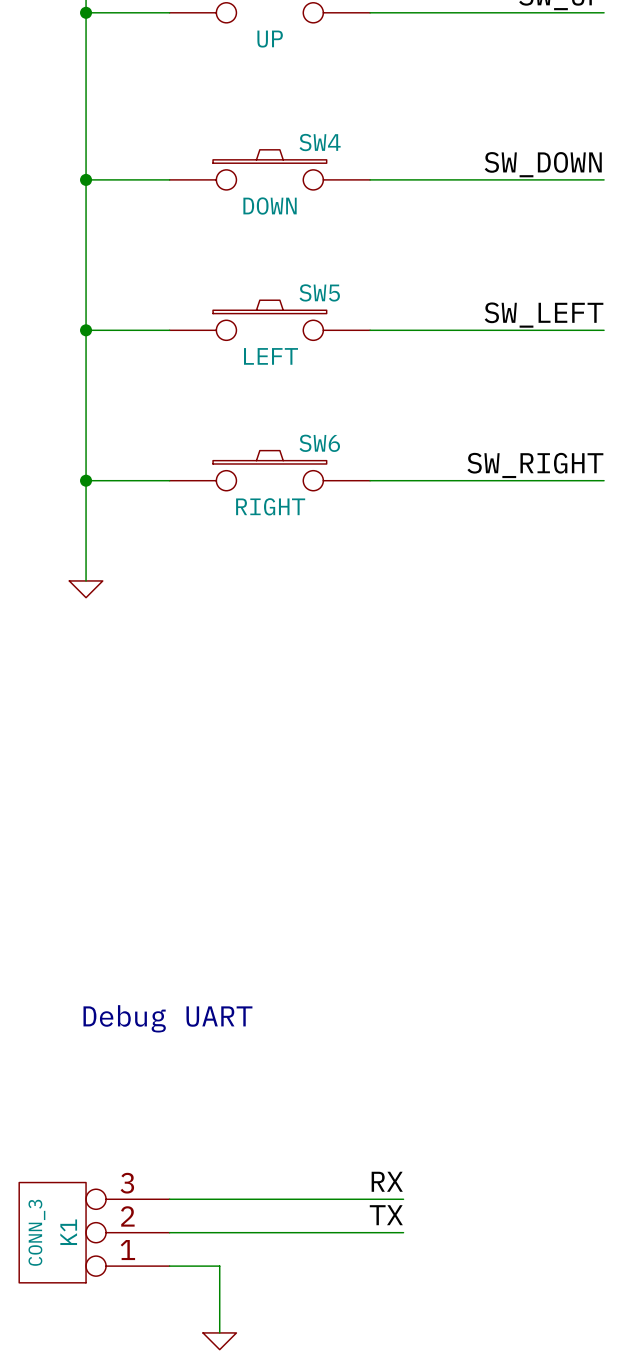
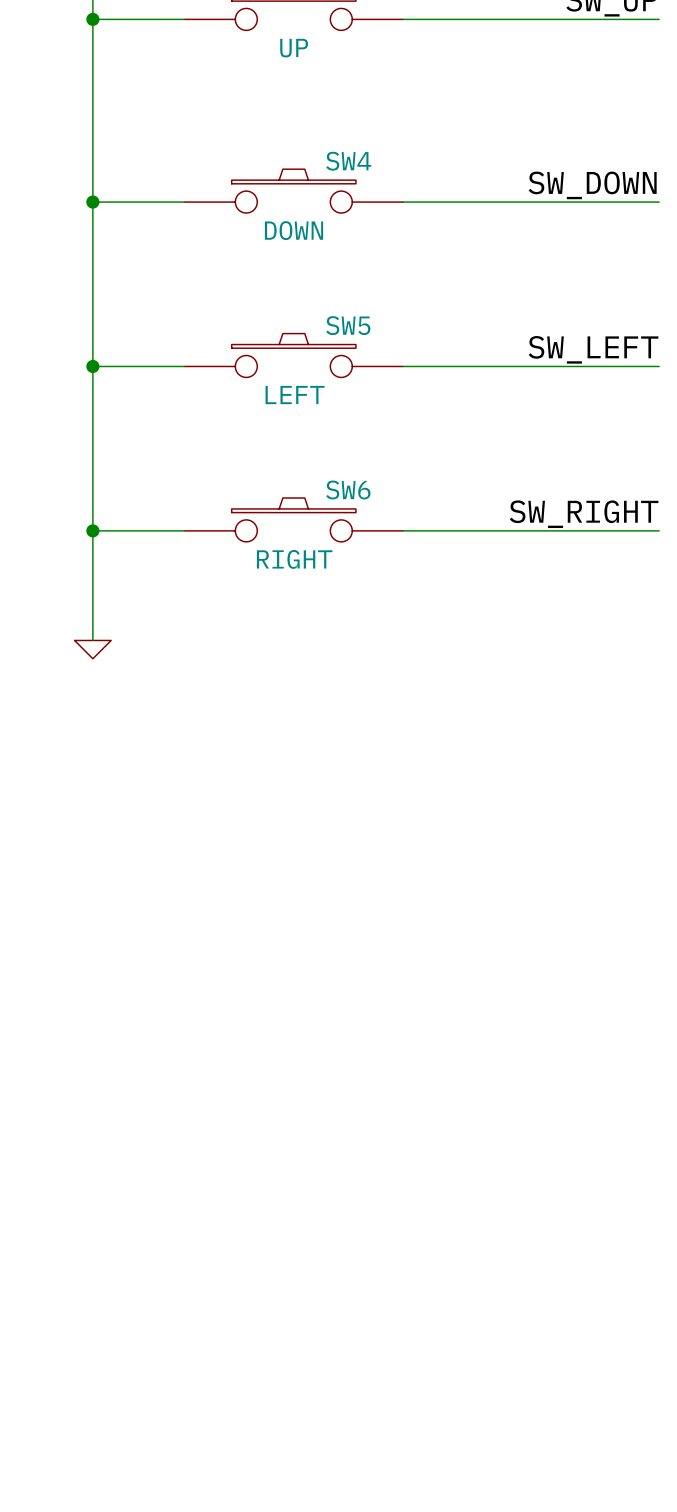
text: Debug UART (167, 1018) -> none
label: RX (387, 1181) -> none
wire: (169, 1199) (403, 1199) -> none
label: TX (386, 1215) -> none
K1: CONN_3 (94, 1232) -> none
wire: (169, 1232) (403, 1232) -> none
wire: (169, 1266) (219, 1266) (219, 1332) -> none
power symbol: (219, 1341) -> none

